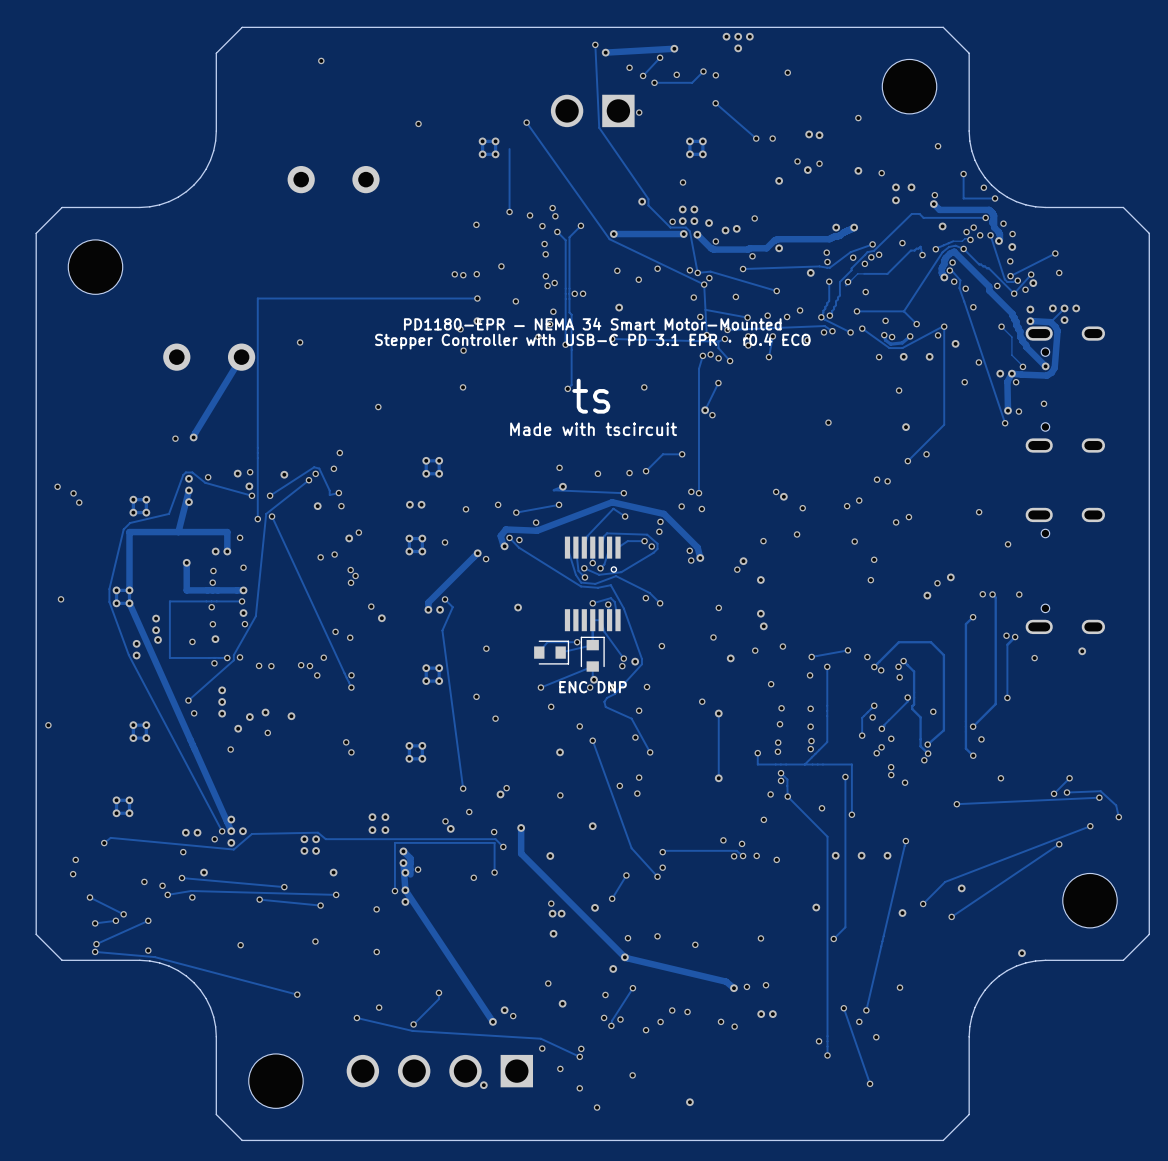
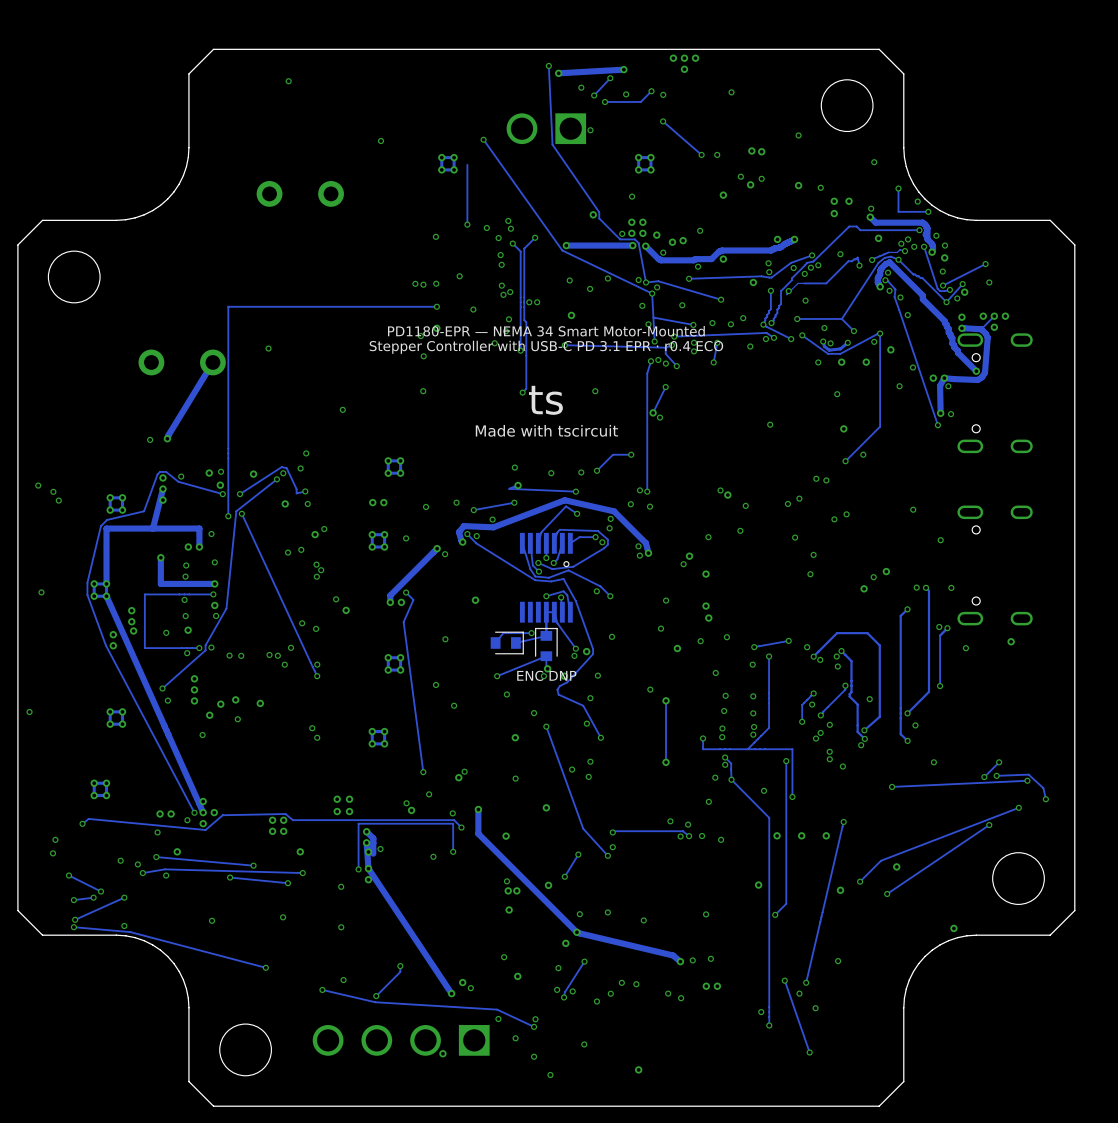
via: (997, 285) -> none
track: (1001, 326) (1011, 337) (1011, 355) (1022, 366) -> none
via: (1001, 326) -> none
via: (1022, 366) -> none
via: (1044, 403) -> none

